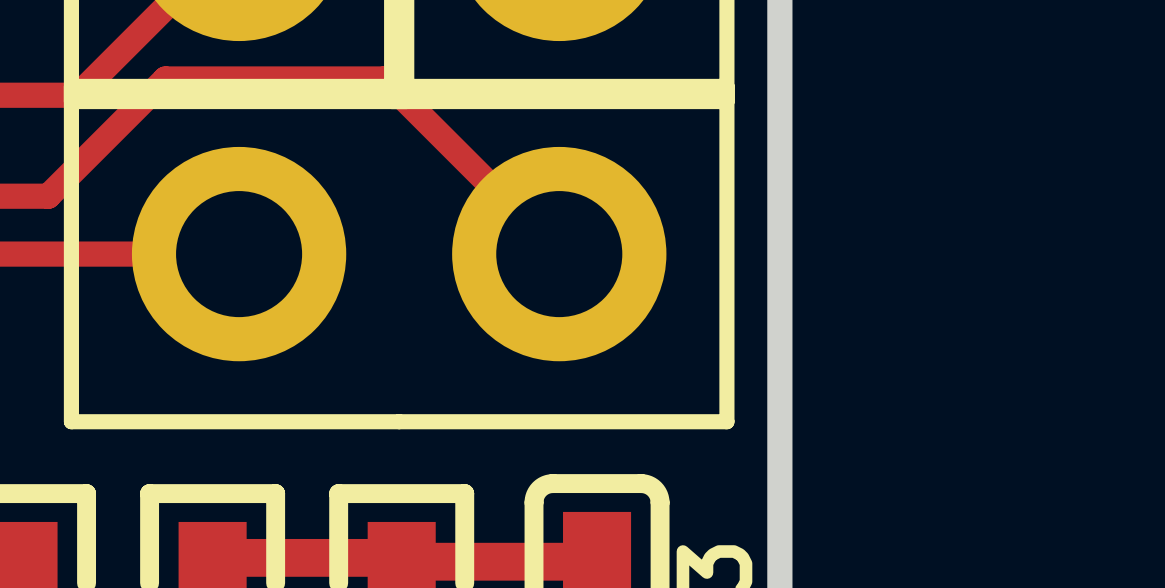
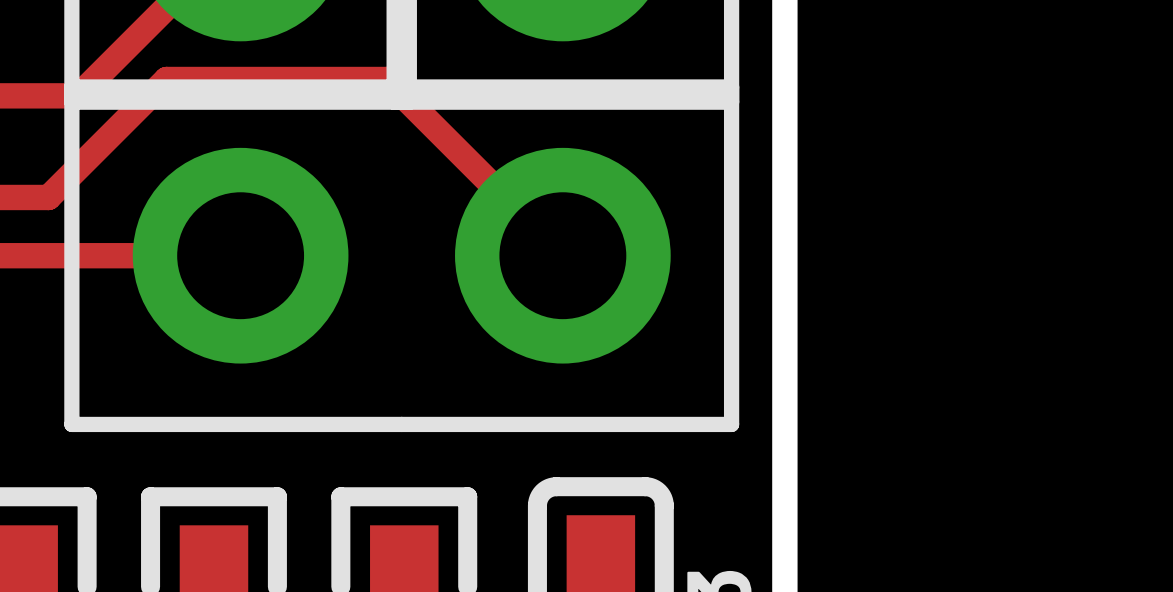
top track: (212, 557) (401, 557) (405, 561) (597, 561) -> none

